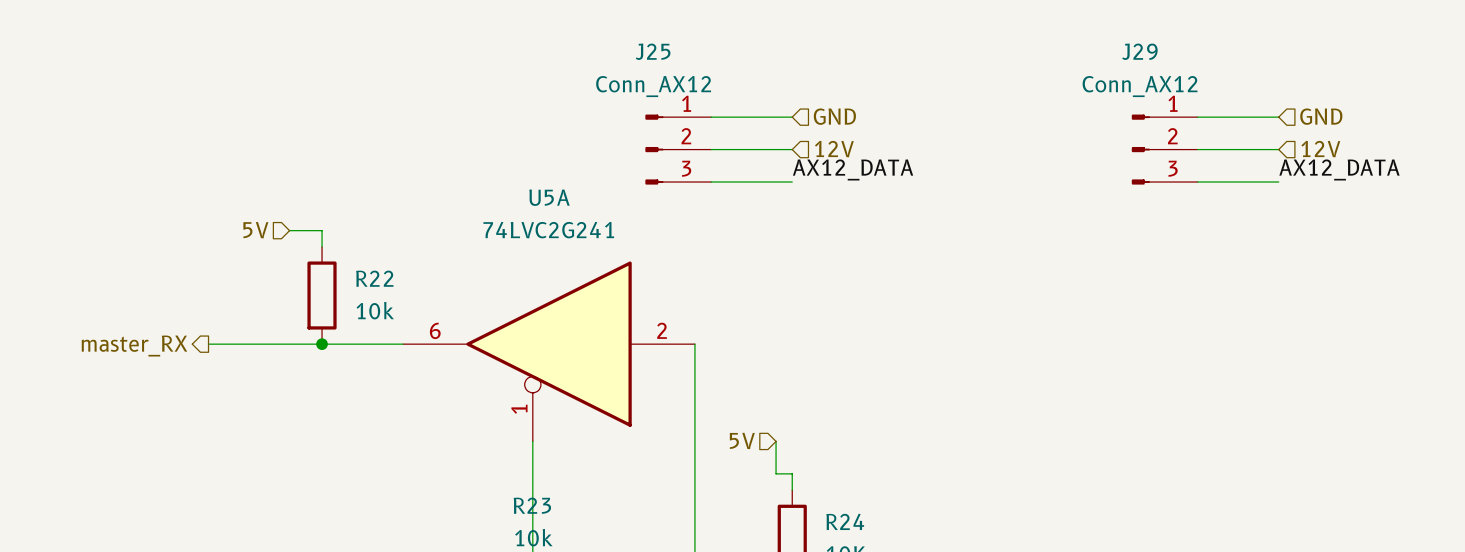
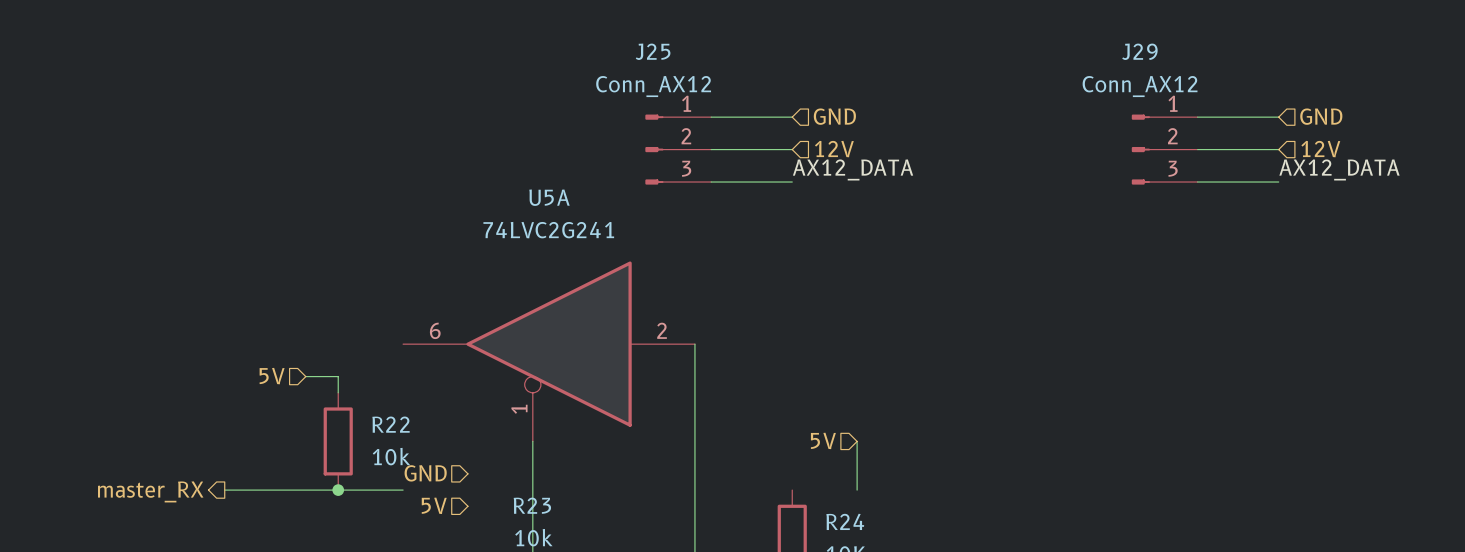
hierarchical label position: 5V (255, 230) -> 5V (272, 376)
wire: (289, 230) (322, 230) (322, 246) -> (305, 376) (338, 376) (338, 392)
R22 position: (322, 295) -> (338, 441)
wire: (208, 344) (403, 344) -> none
junction: (322, 344) -> none
hierarchical label position: master_RX (134, 345) -> master_RX (150, 491)
hierarchical label position: 5V (742, 440) -> 5V (823, 440)
wire: (776, 441) (776, 473) (792, 473) (792, 490) -> none
wire: none -> (857, 441) (857, 490)
hierarchical label: none -> GND (425, 473)
wire: none -> (224, 490) (403, 490)
junction: none -> (338, 490)
hierarchical label: none -> 5V (434, 505)

